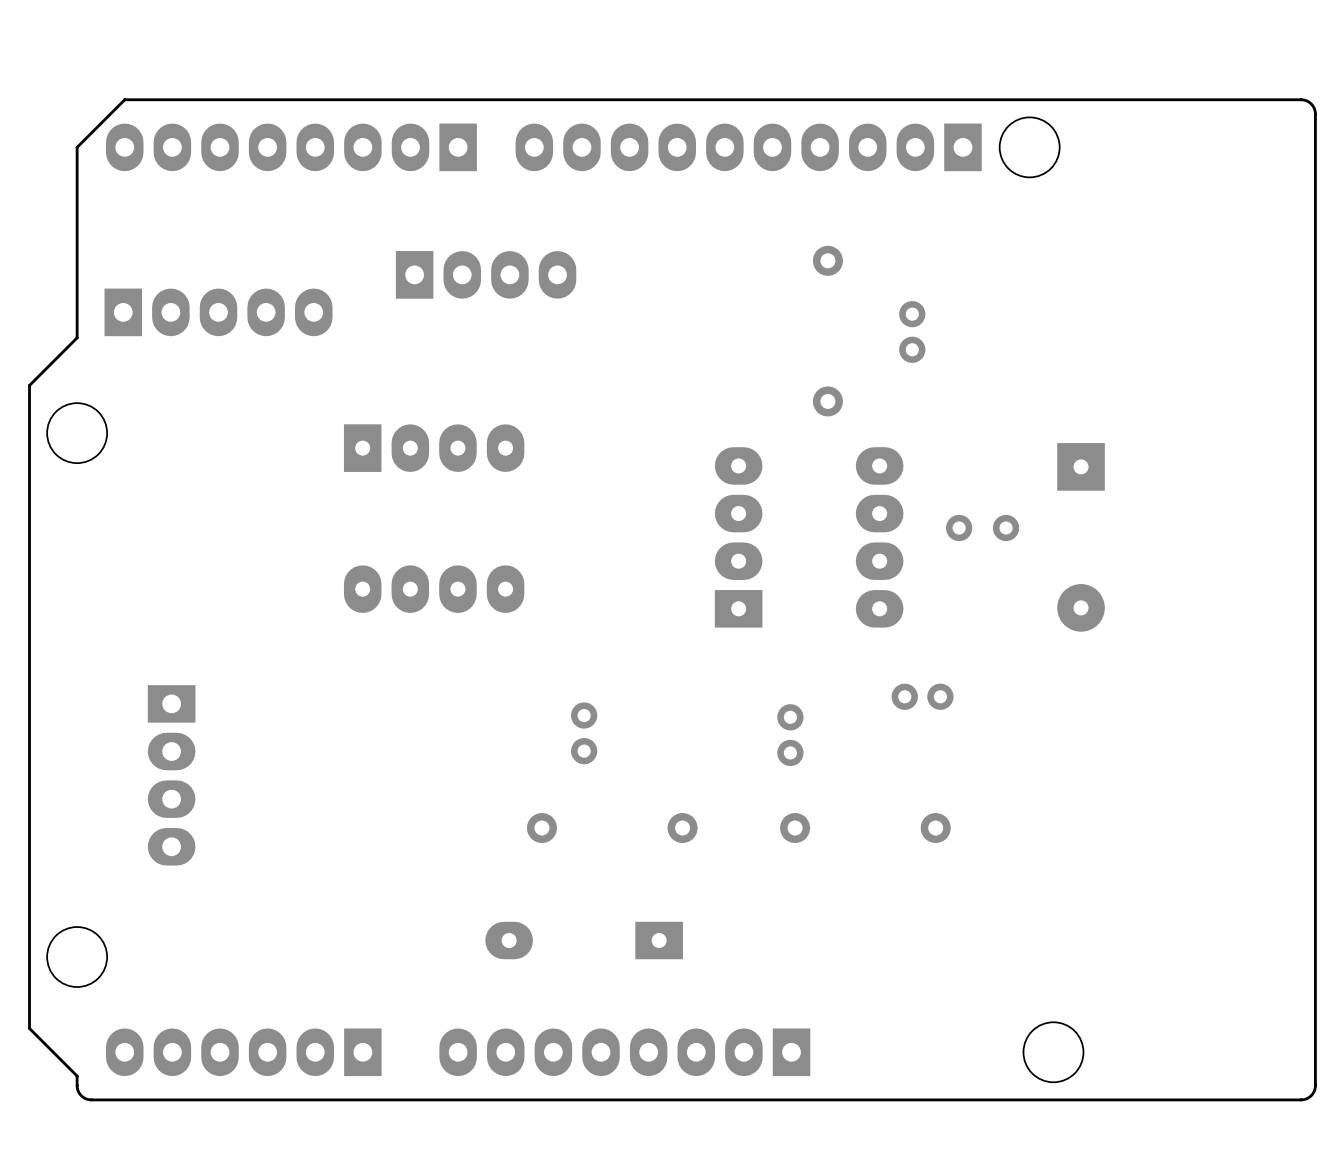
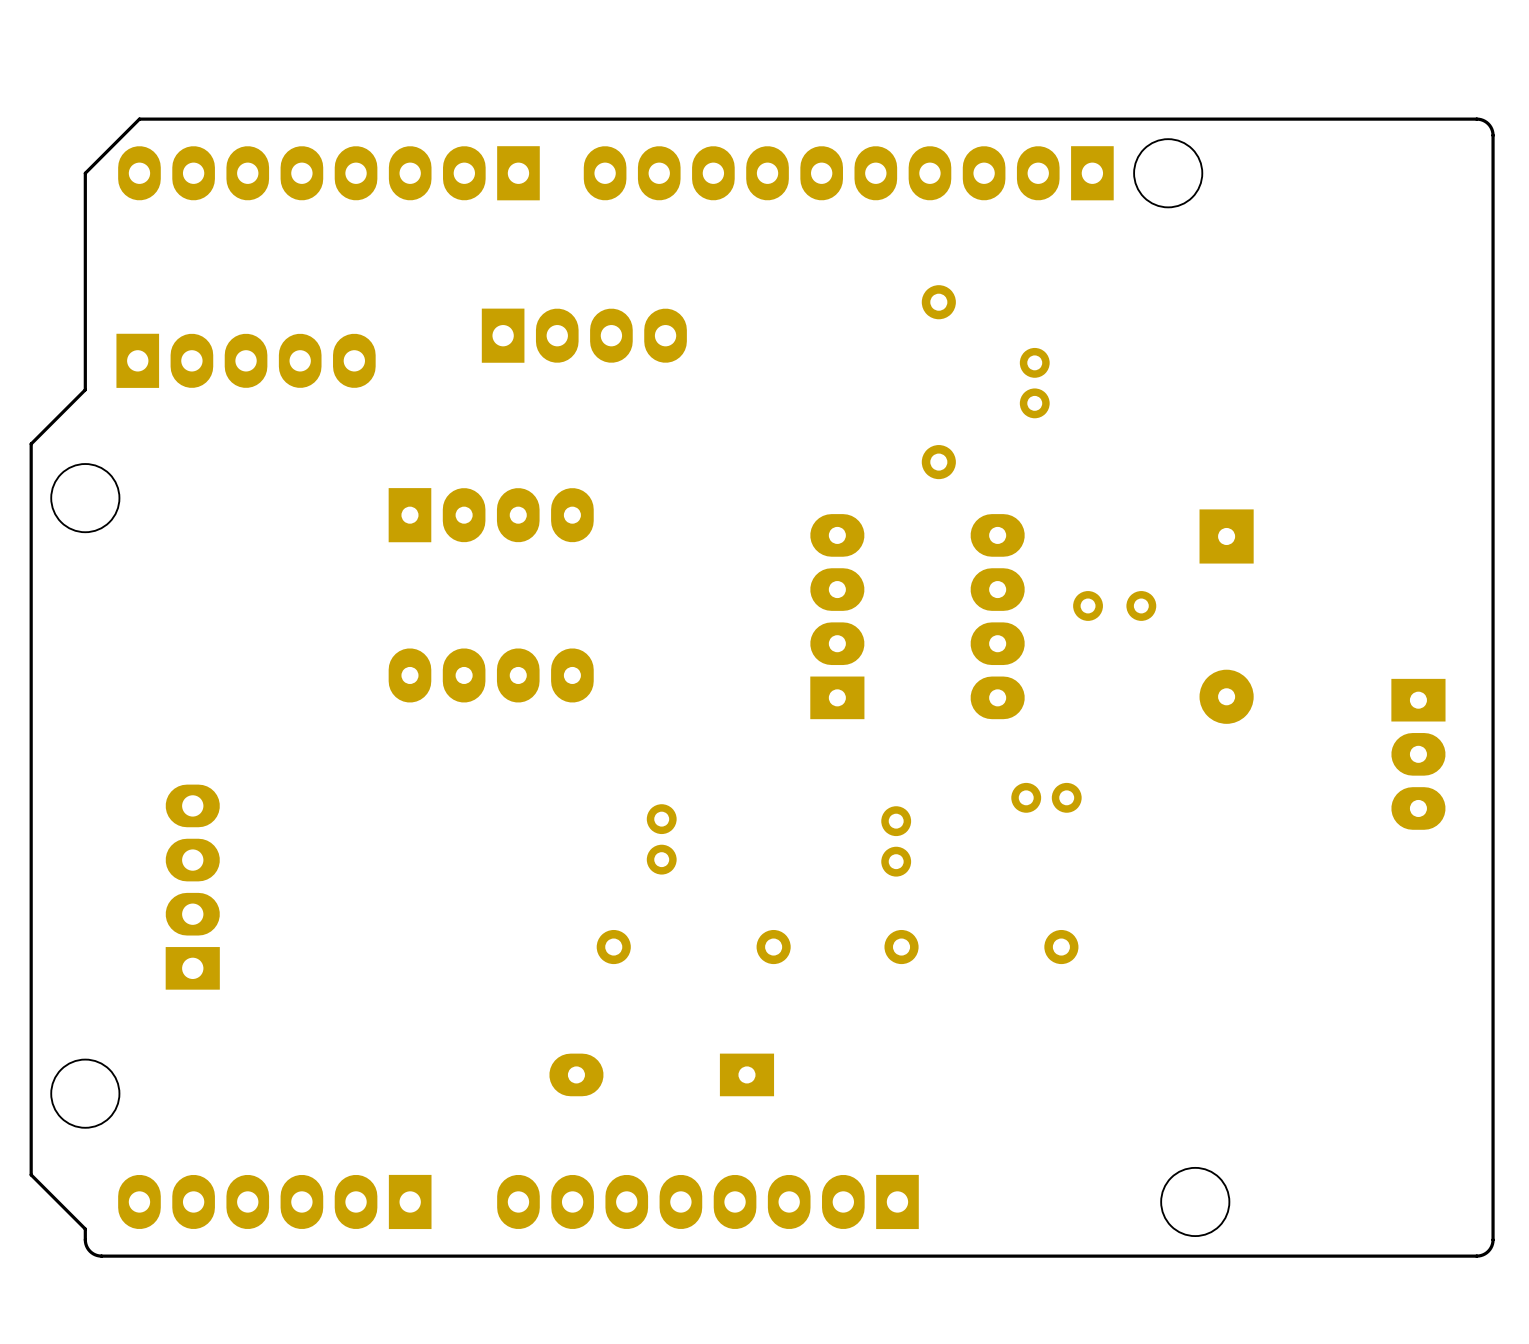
part position: (486, 274) -> (584, 335)
part: none -> (1418, 754)
part rotation: 0° (171, 775) -> 180° (192, 887)

